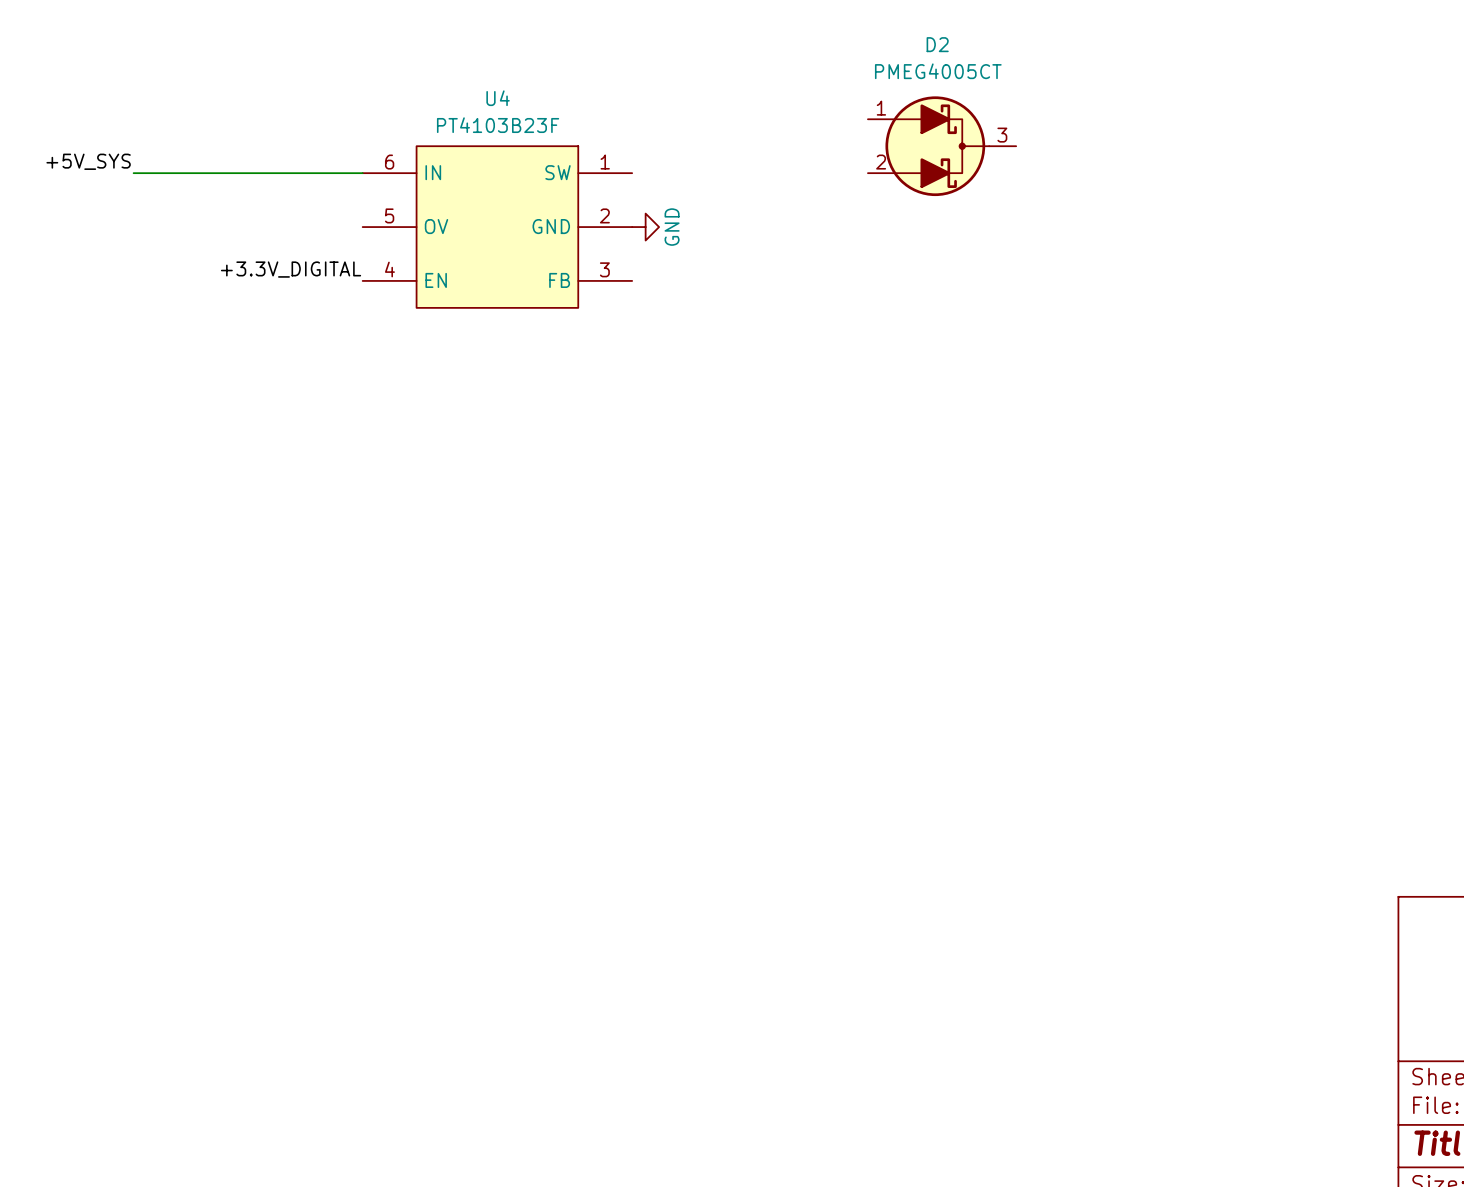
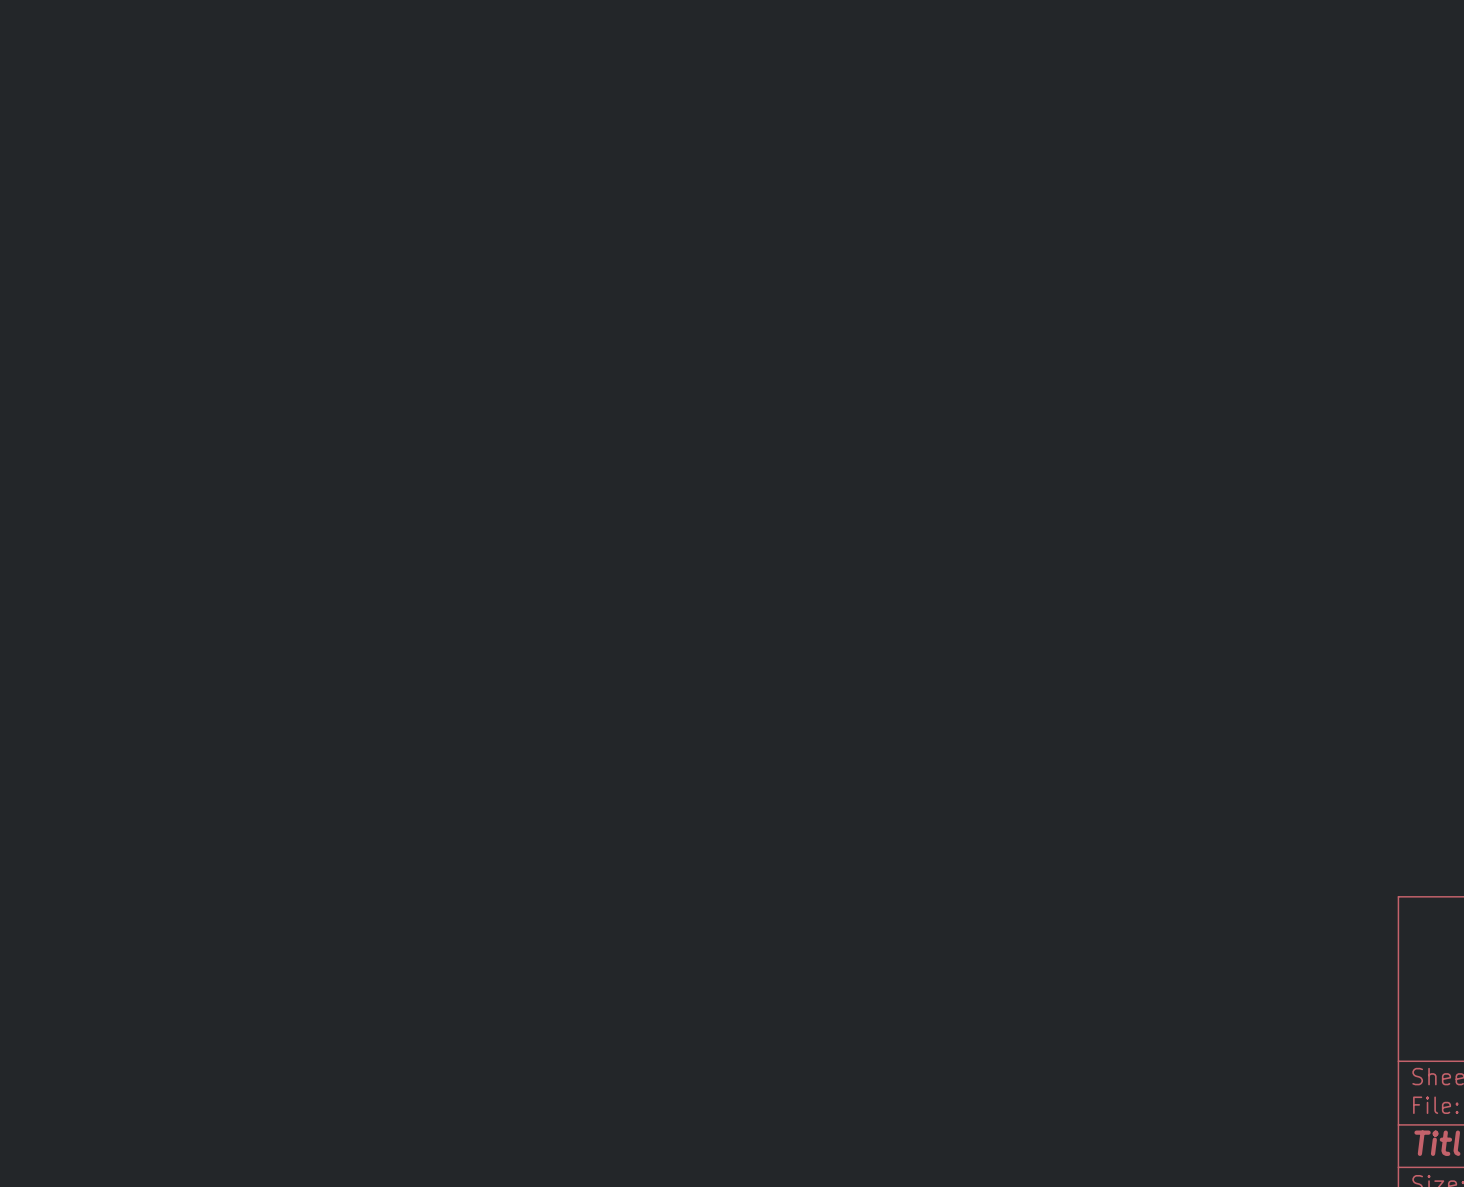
D2: PMEG4005CT (942, 146) -> none
label: +5V_SYS (88, 161) -> none
wire: (133, 173) (362, 173) -> none
U4: PT4103B23F (497, 227) -> none
power symbol: GND (645, 227) -> none
label: +3.3V_DIGITAL (291, 269) -> none

